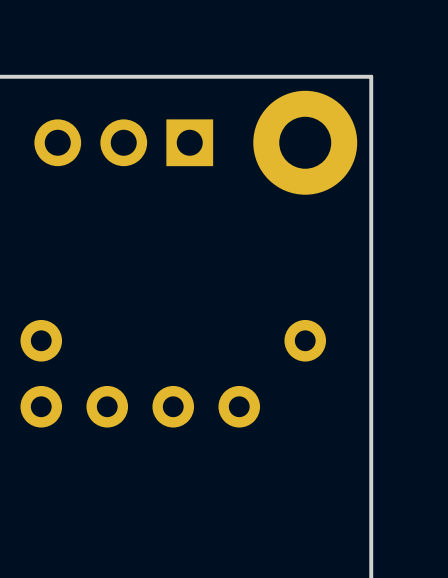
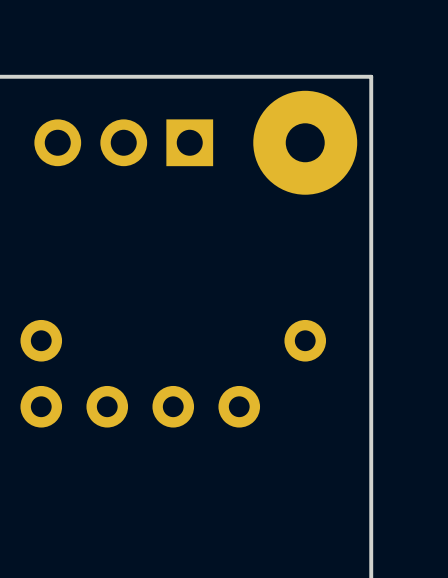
part footprint: [253, 90, 358, 195] -> [253, 90, 358, 195]

